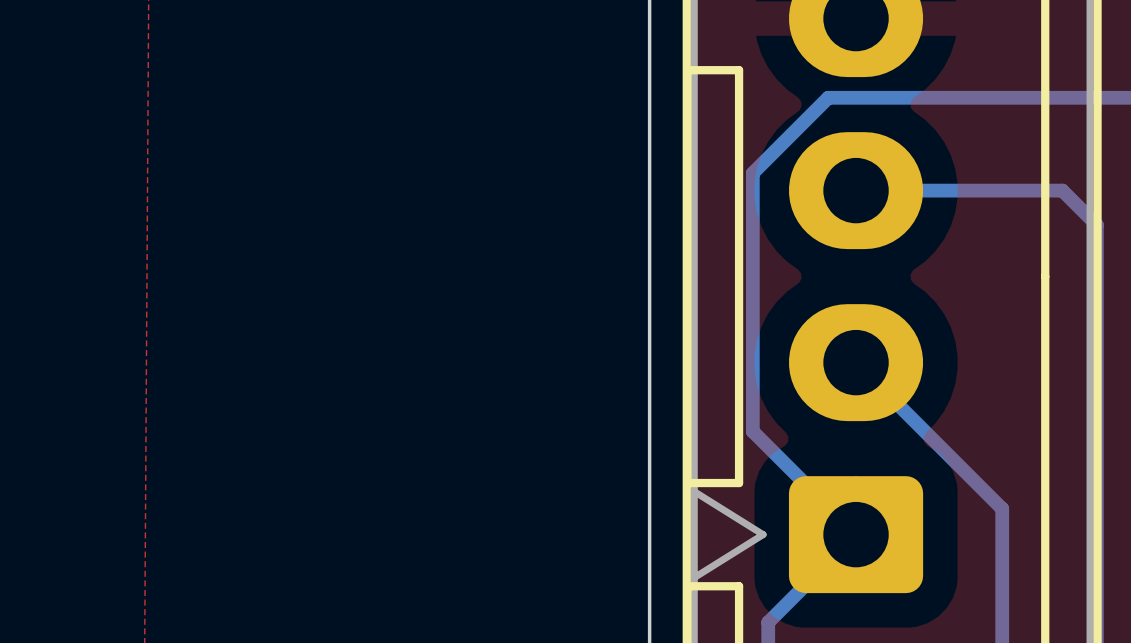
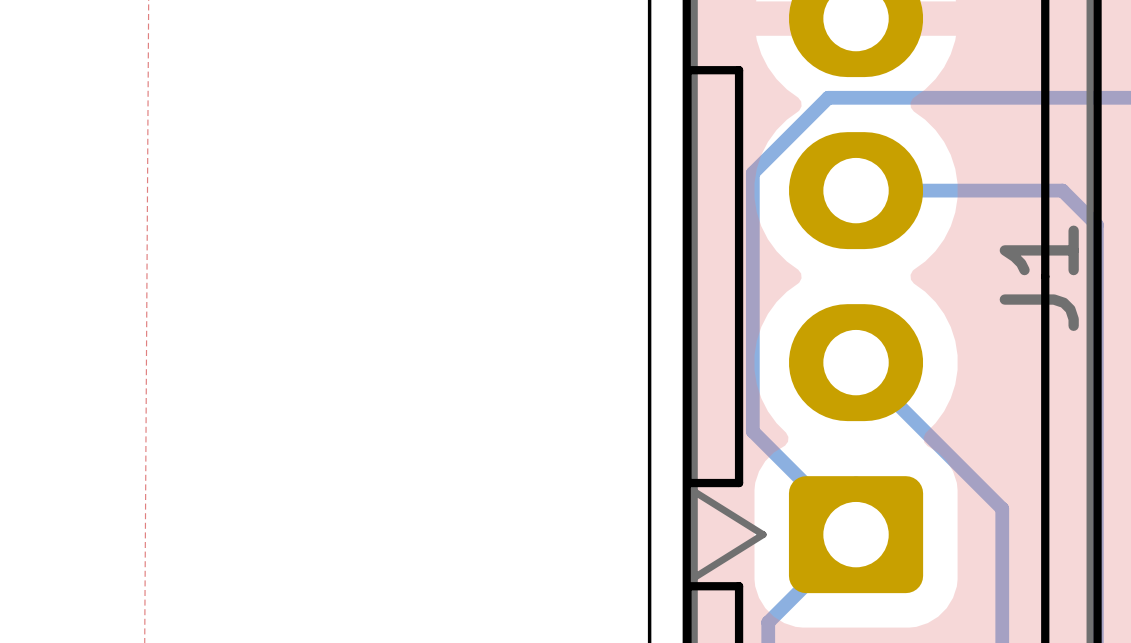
J1 name: none -> J1 (1039, 278)

